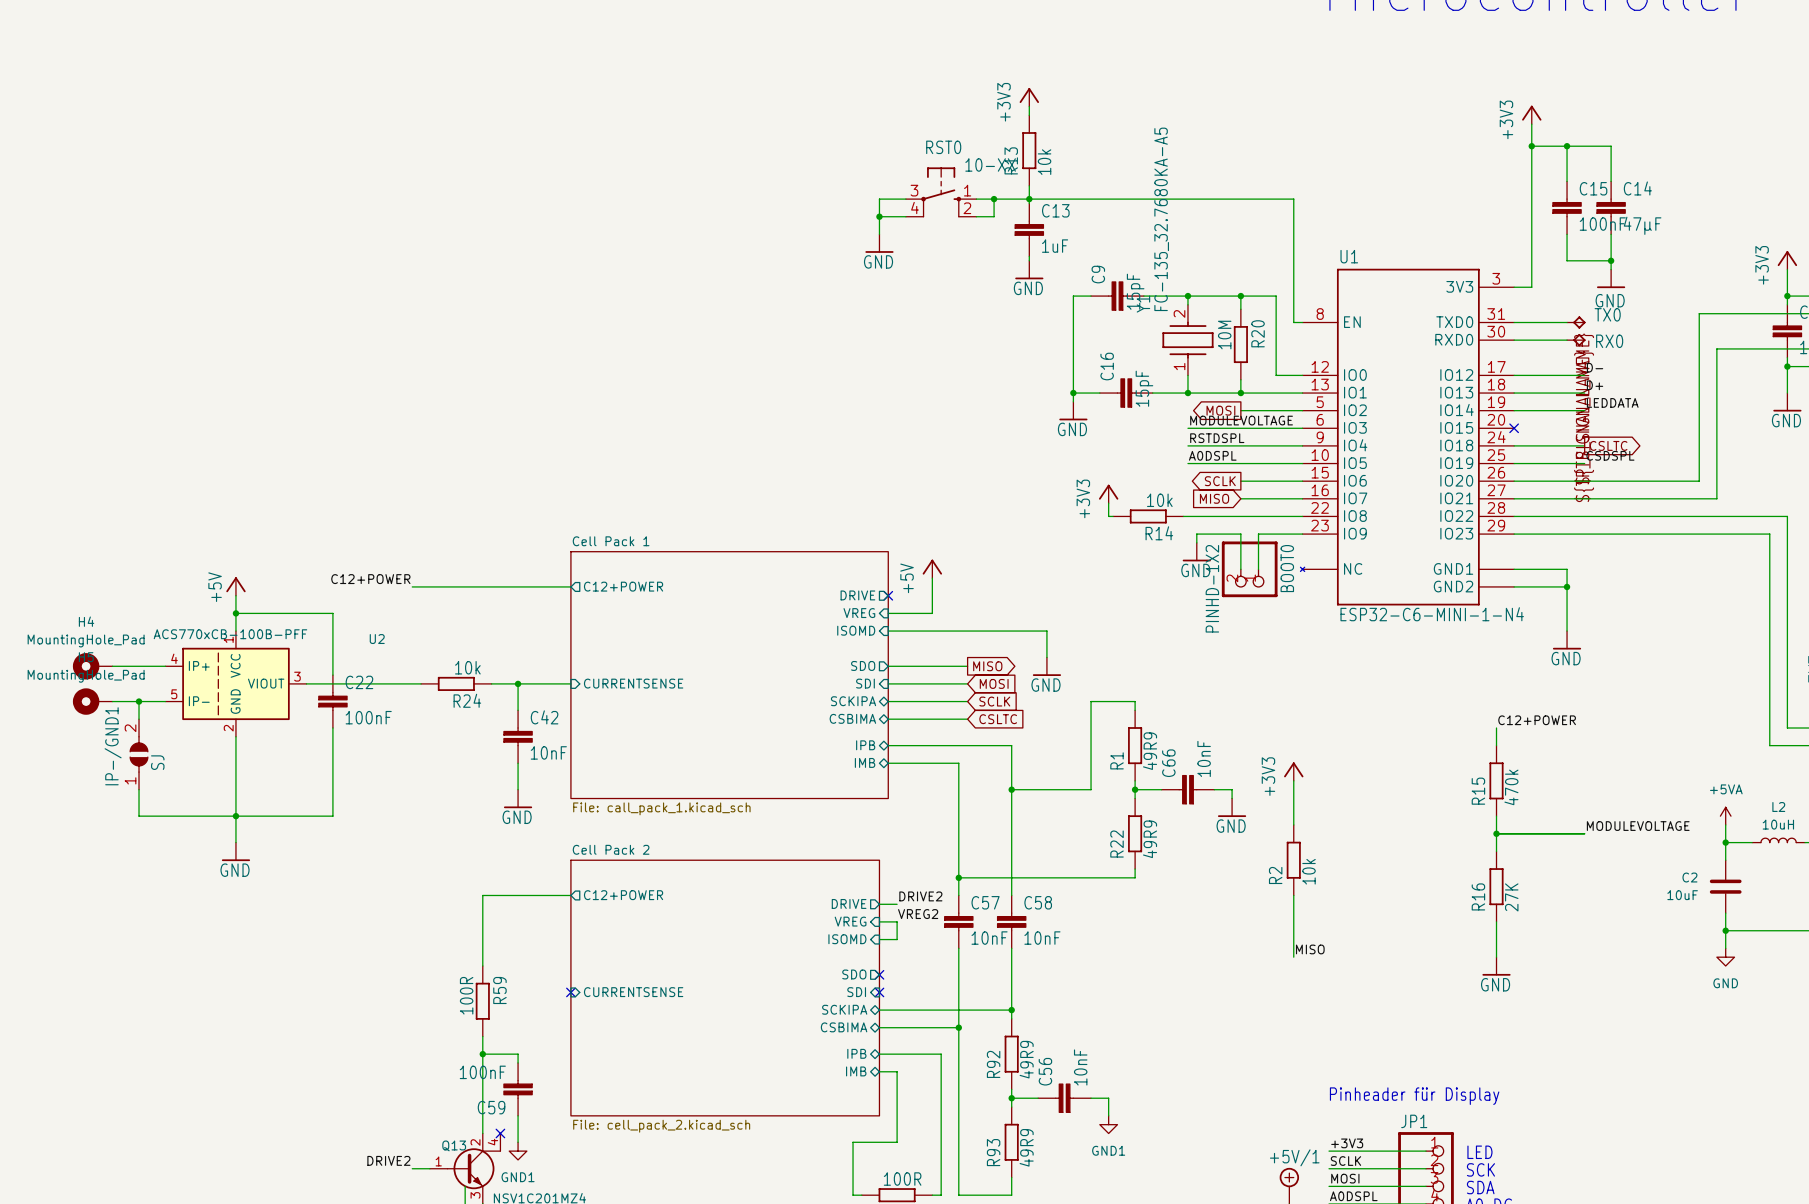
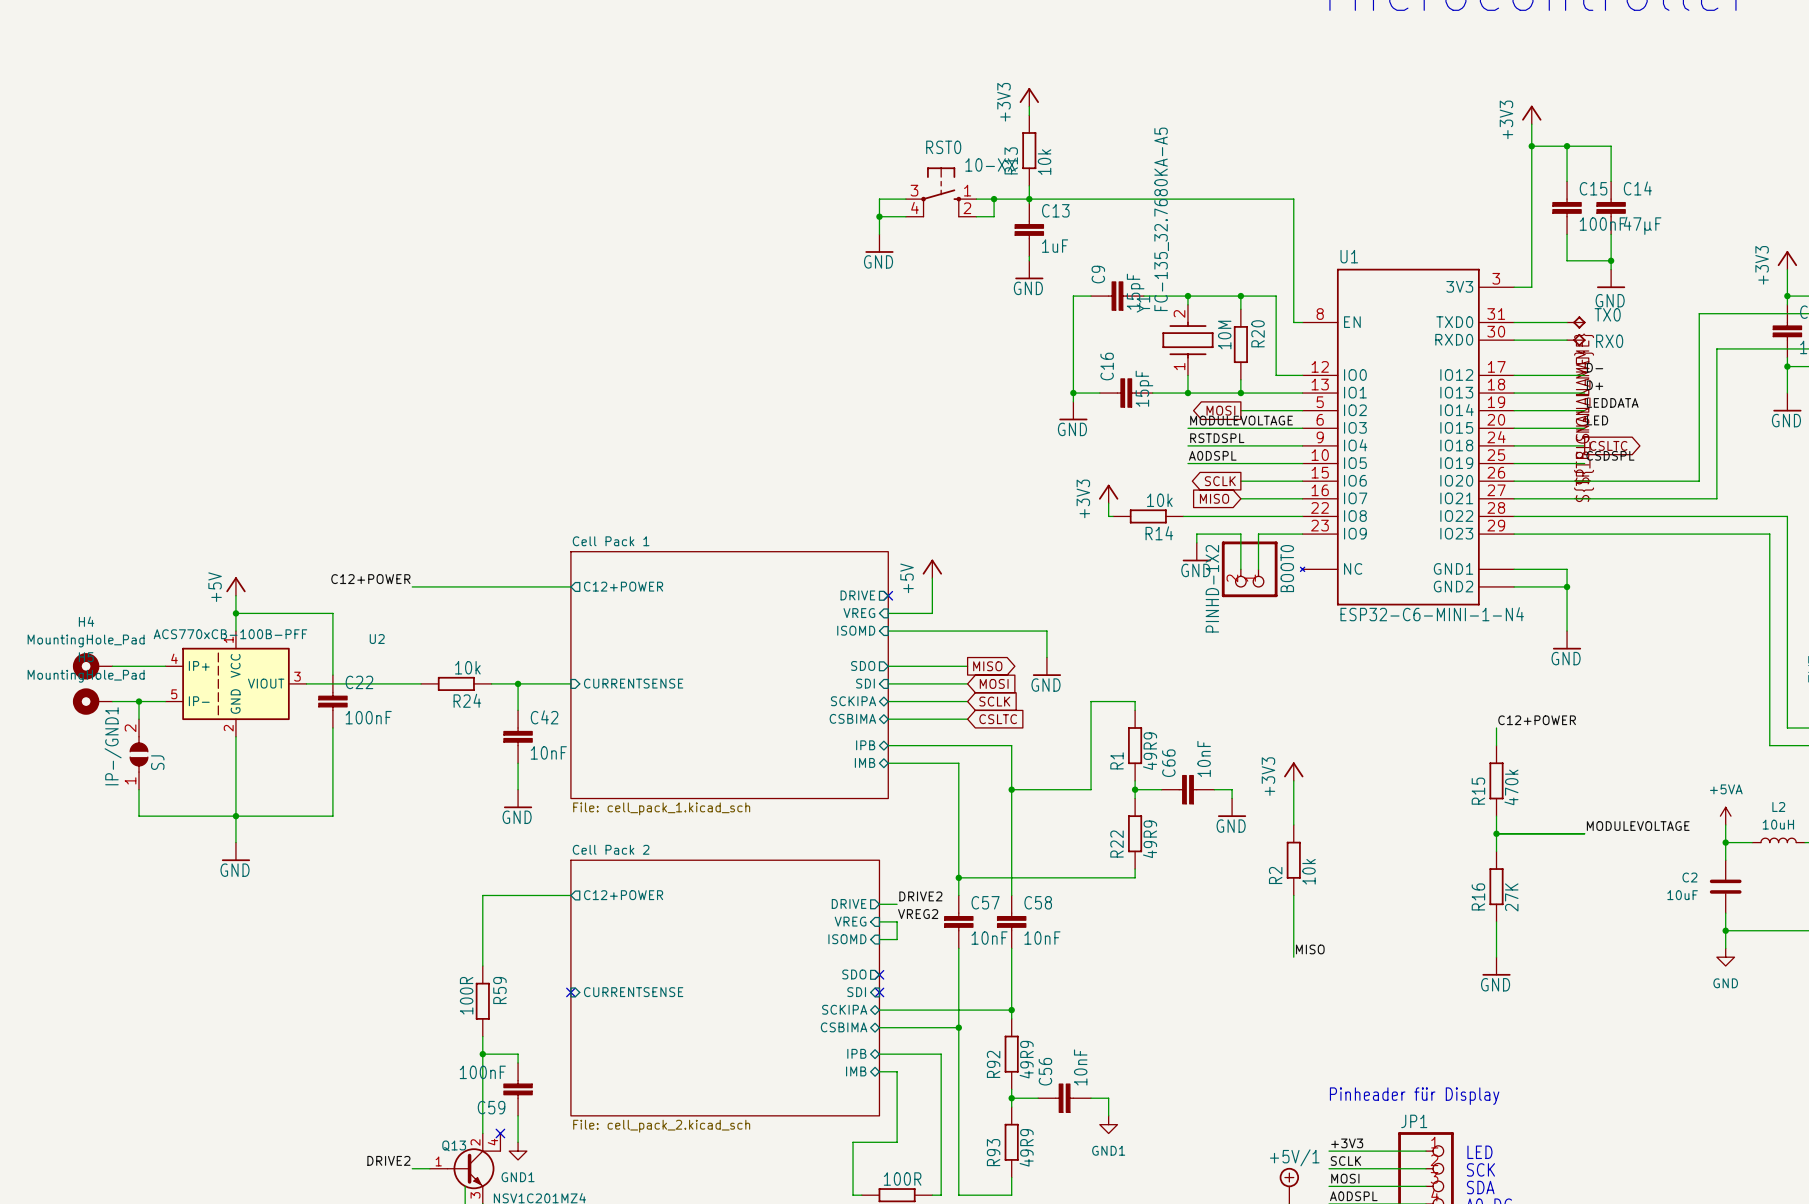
label: none -> LED (1597, 420)
wire: none -> (1514, 428) (1584, 428)
no-connect mark: (1514, 428) -> none
sheet Cell Pack 1 value: File: call_pack_1.kicad_sch (661, 808) -> File: cell_pack_1.kicad_sch (661, 808)

